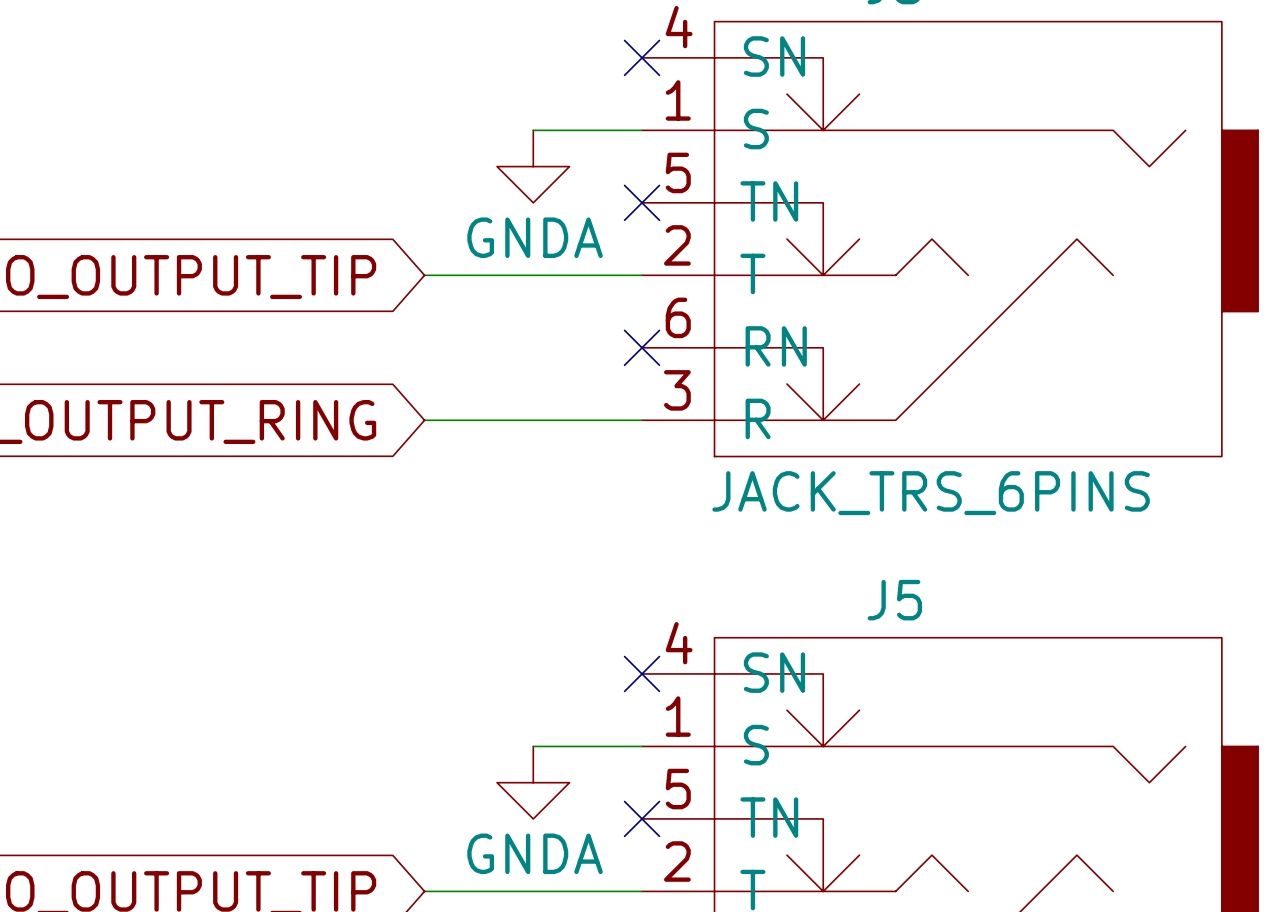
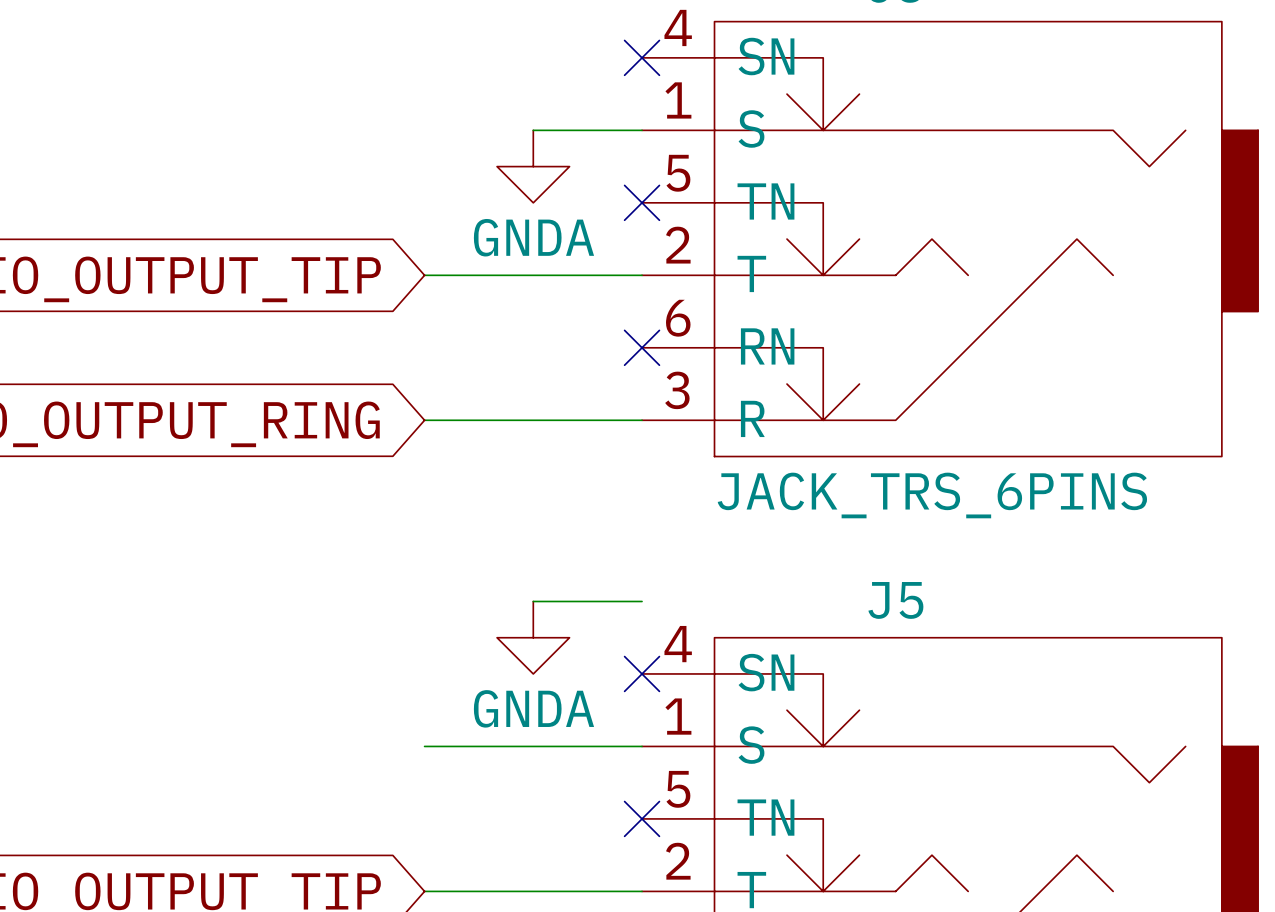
wire: none -> (533, 601) (642, 601)
wire: none -> (424, 746) (533, 746)
power symbol position: GNDA (533, 782) -> GNDA (533, 637)

